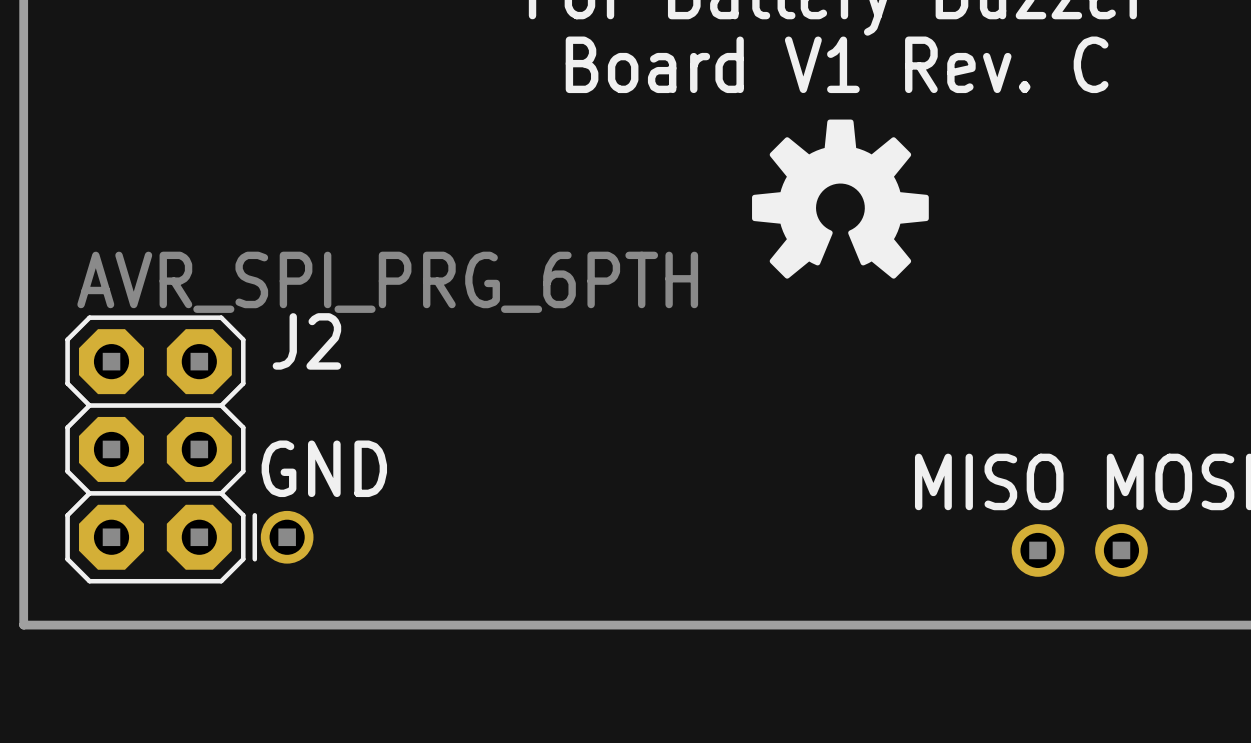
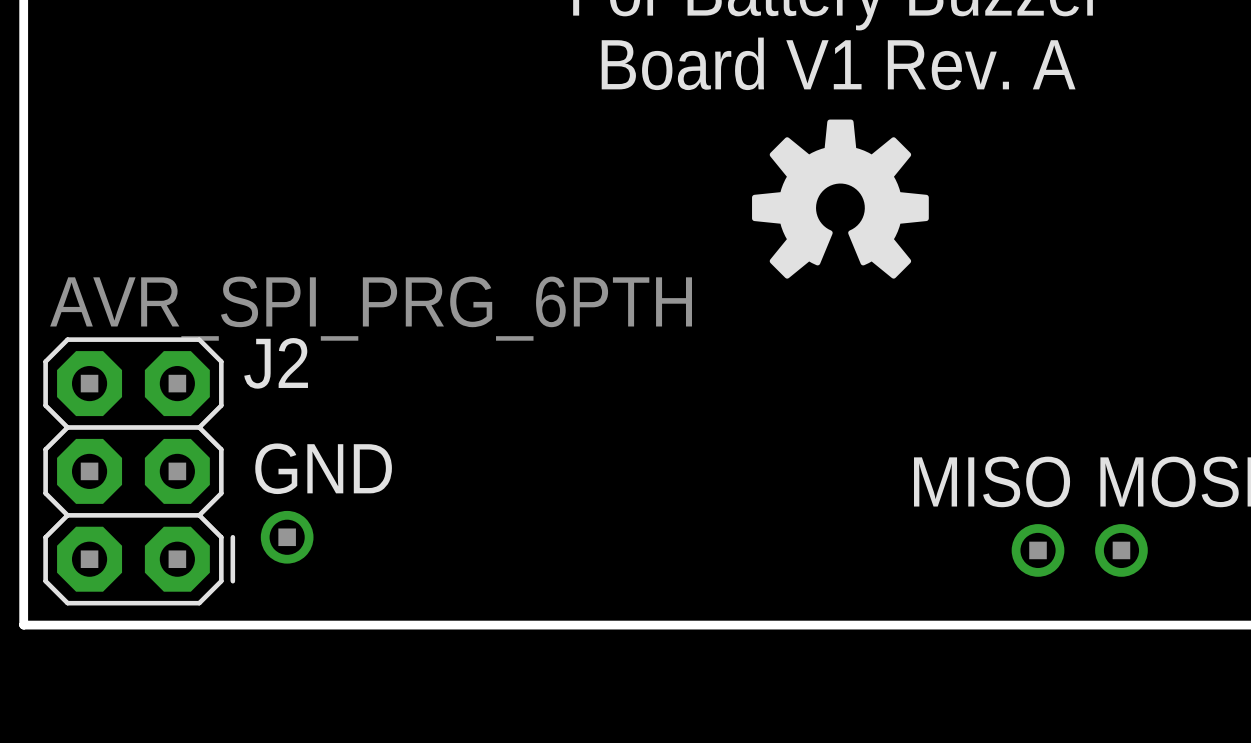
text: Board V1 Rev. C (837, 64) -> Board V1 Rev. A (838, 63)
J2 position: (161, 449) -> (139, 471)

